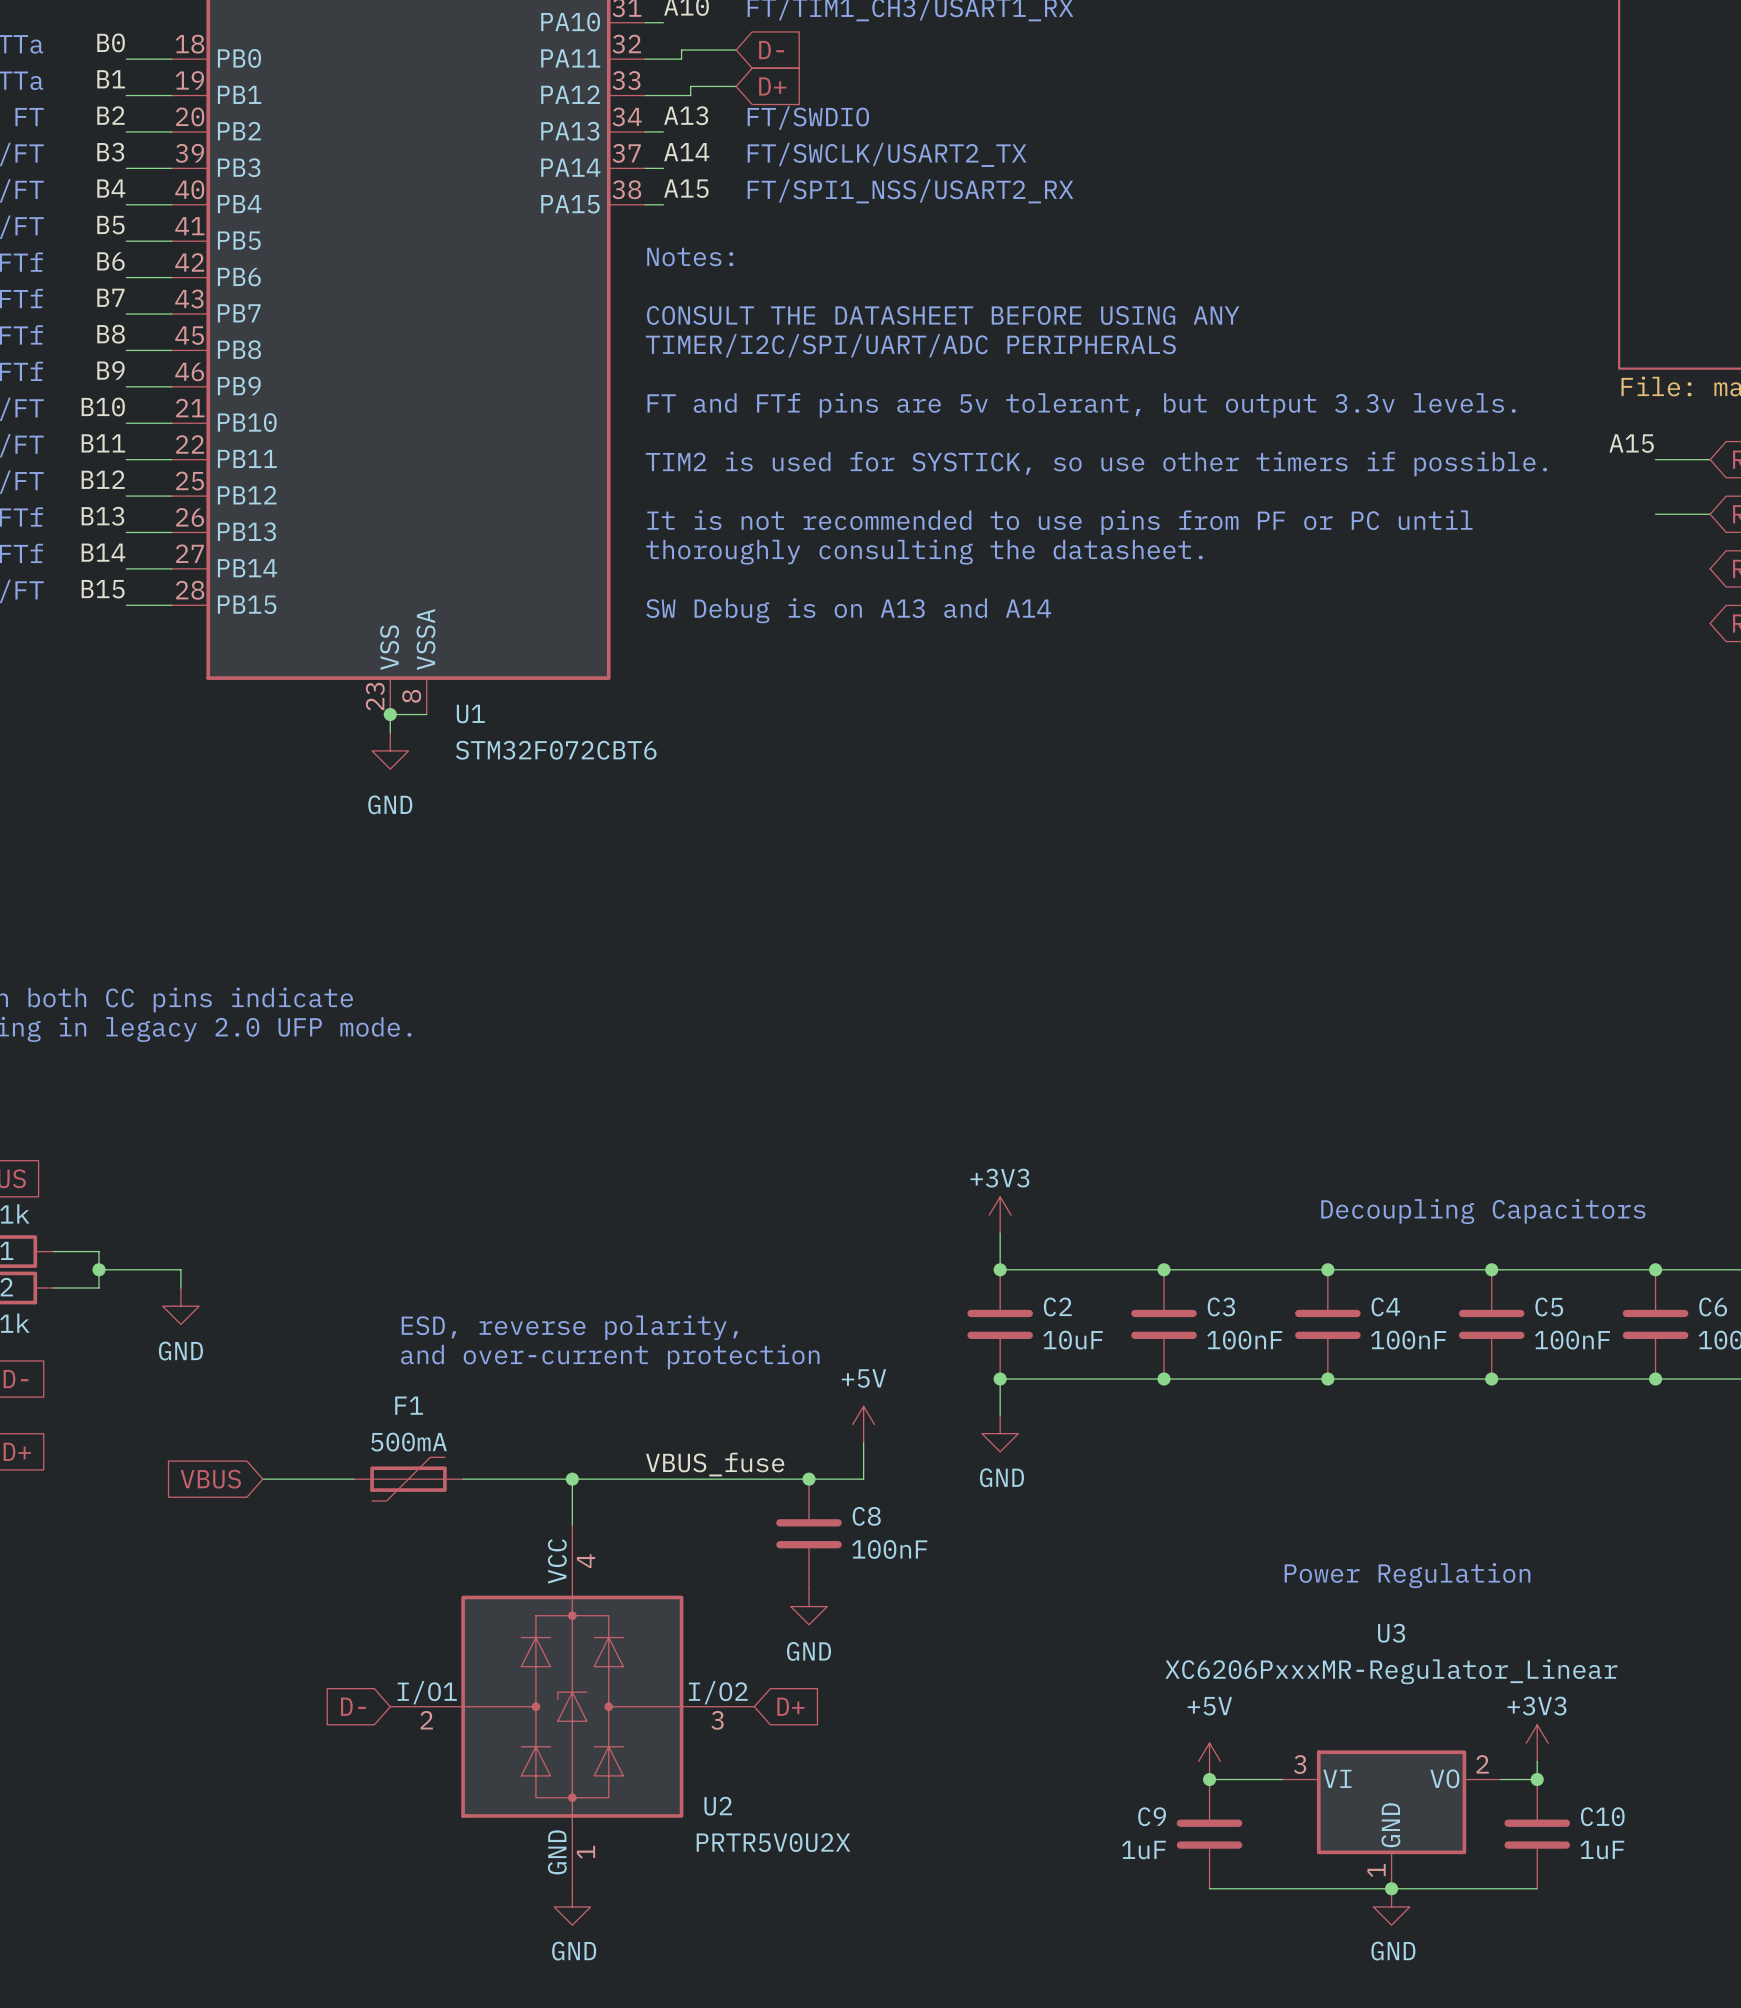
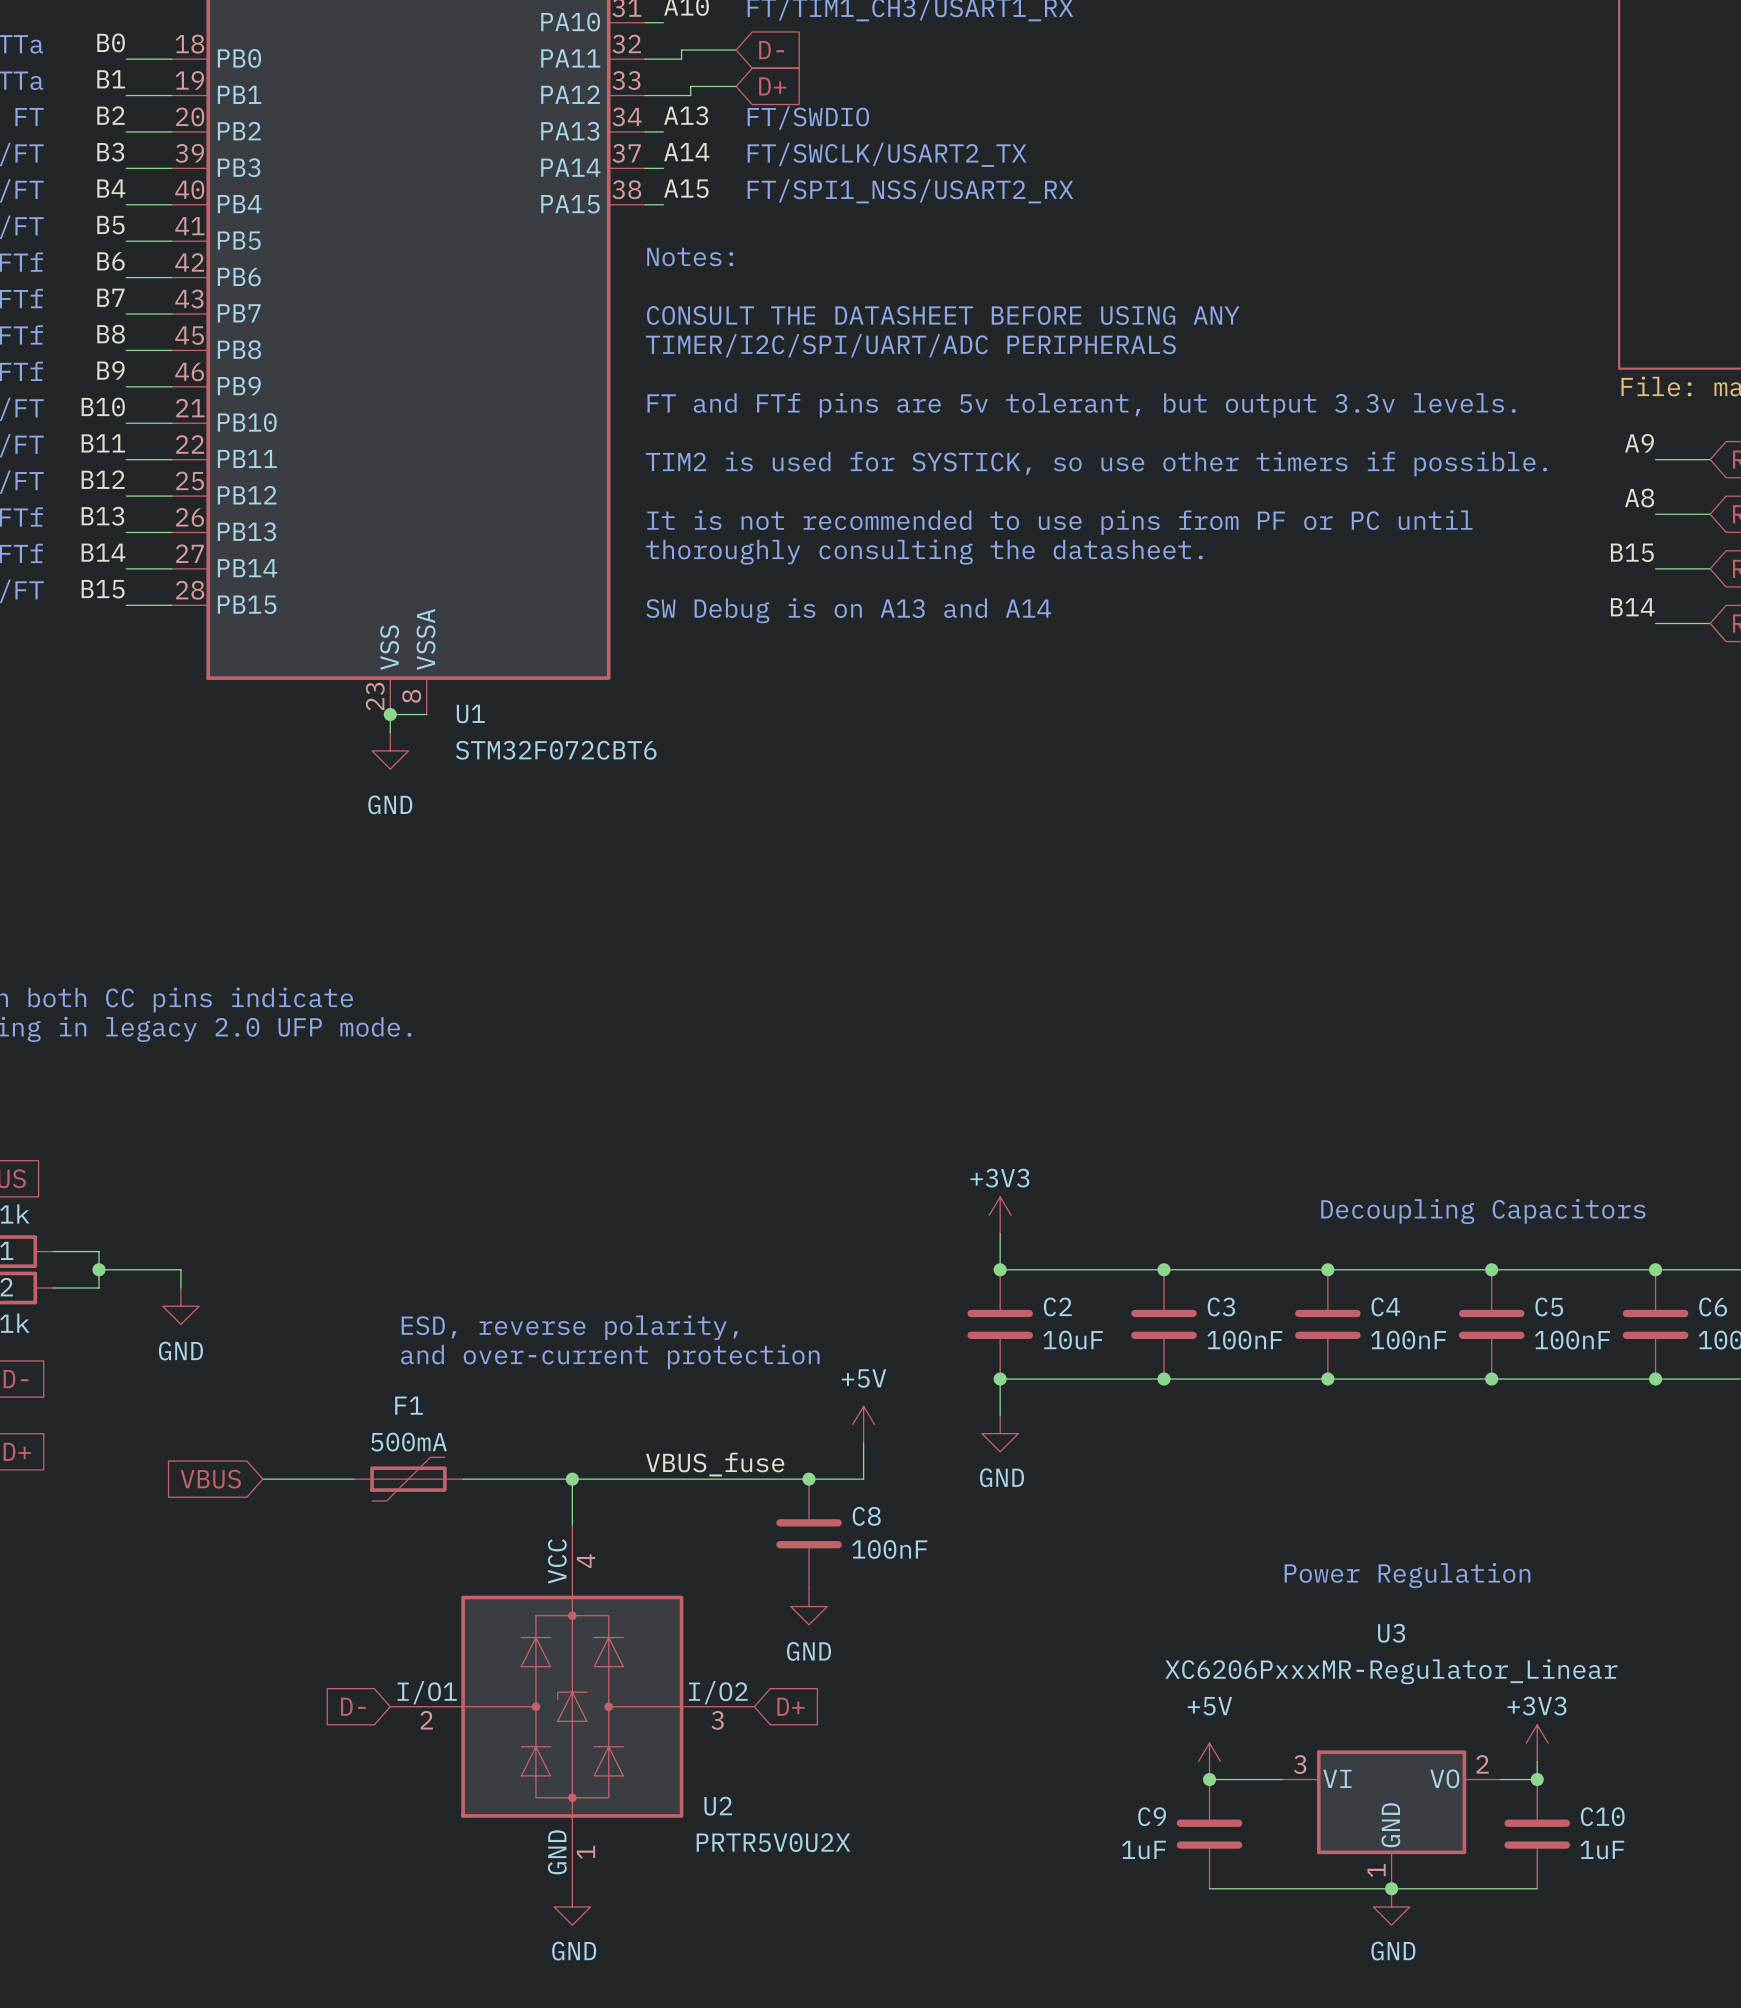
label: A15 (1631, 443) -> A9 (1639, 443)
label: none -> A8 (1639, 498)
label: none -> B15 (1632, 552)
wire: none -> (1655, 568) (1710, 568)
label: none -> B14 (1632, 607)
wire: none -> (1655, 623) (1710, 623)

